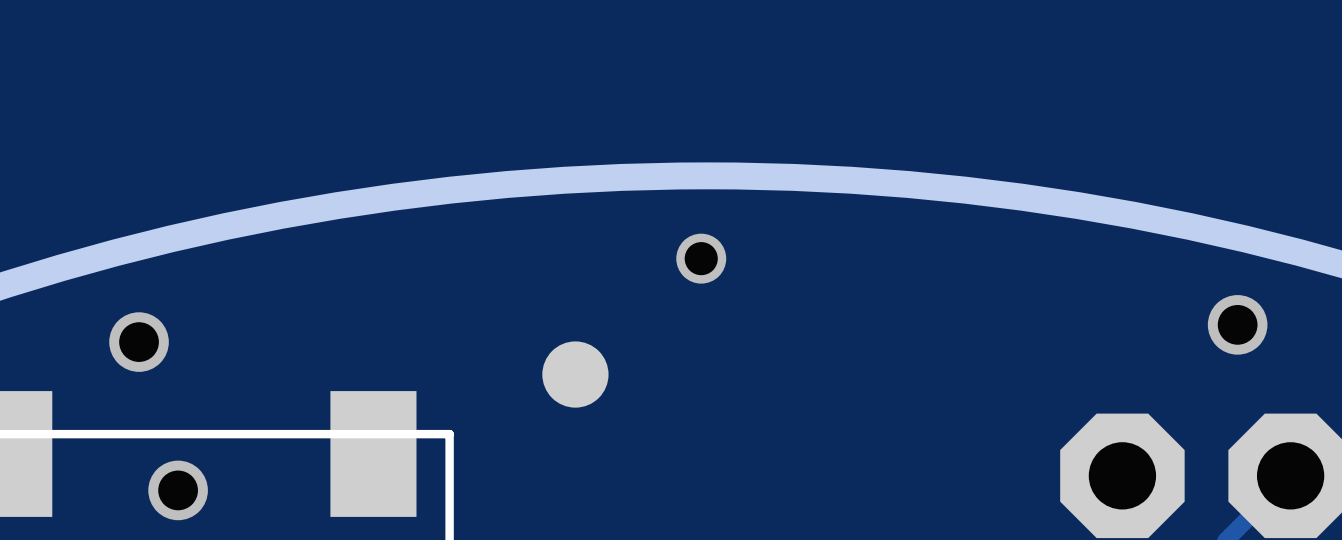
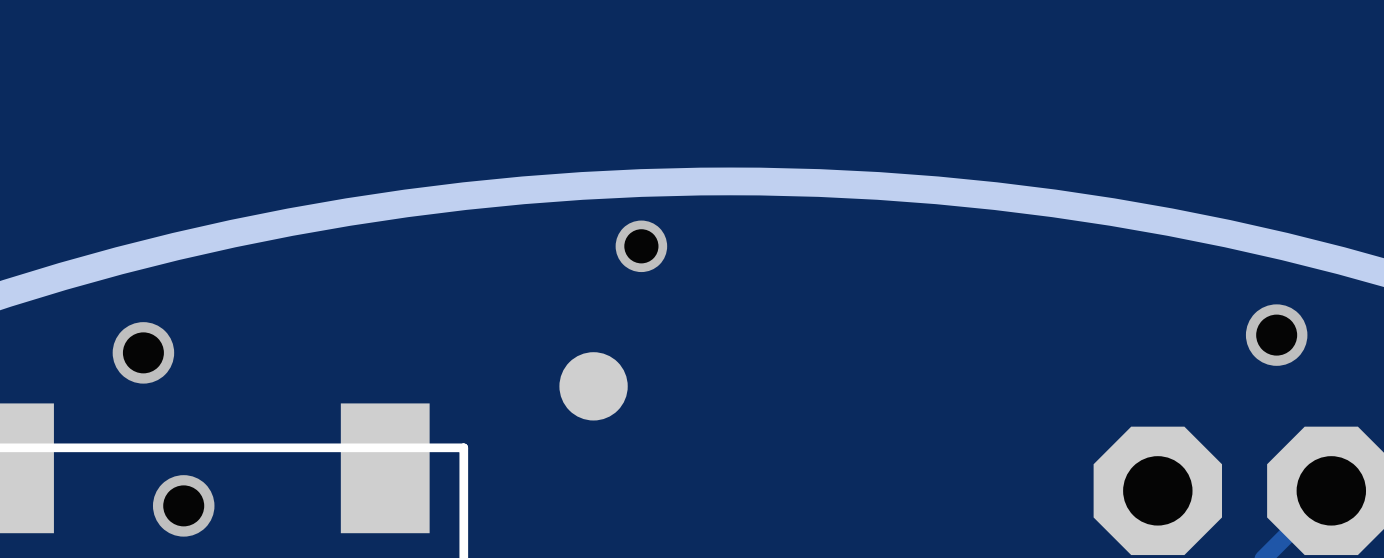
via position: (701, 258) -> (641, 246)

